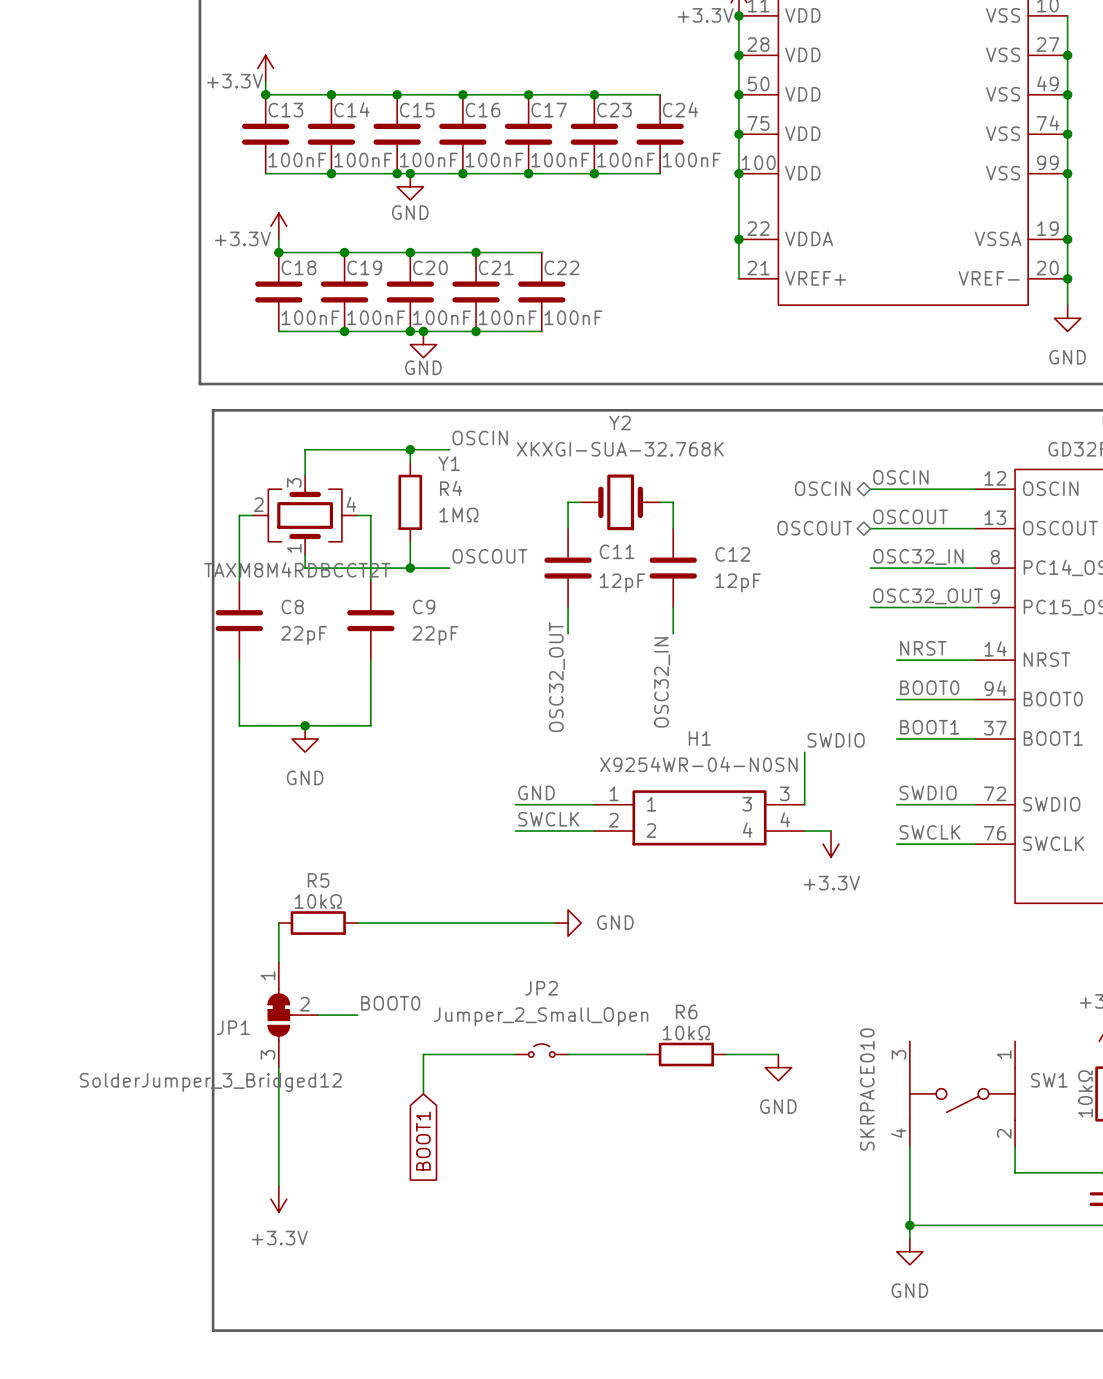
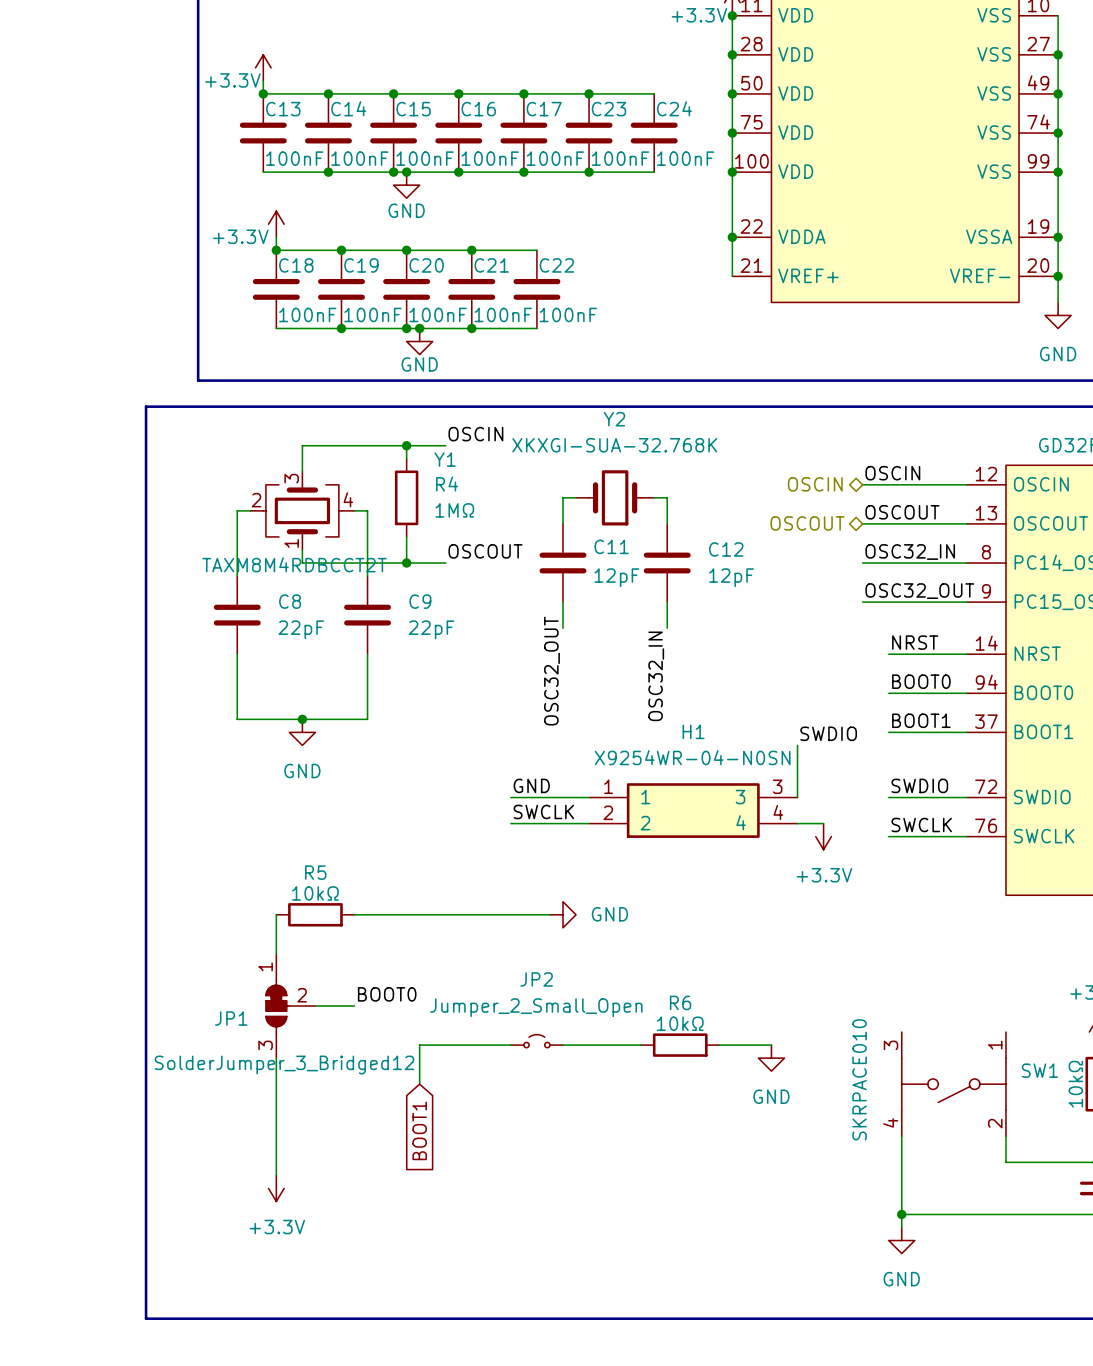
line: (213, 410) (213, 1330) -> (211, 406) (146, 406) (146, 1318) (211, 1318)
JP1 value position: SolderJumper_3_Bridged12 (210, 1082) -> SolderJumper_3_Bridged12 (284, 1065)

